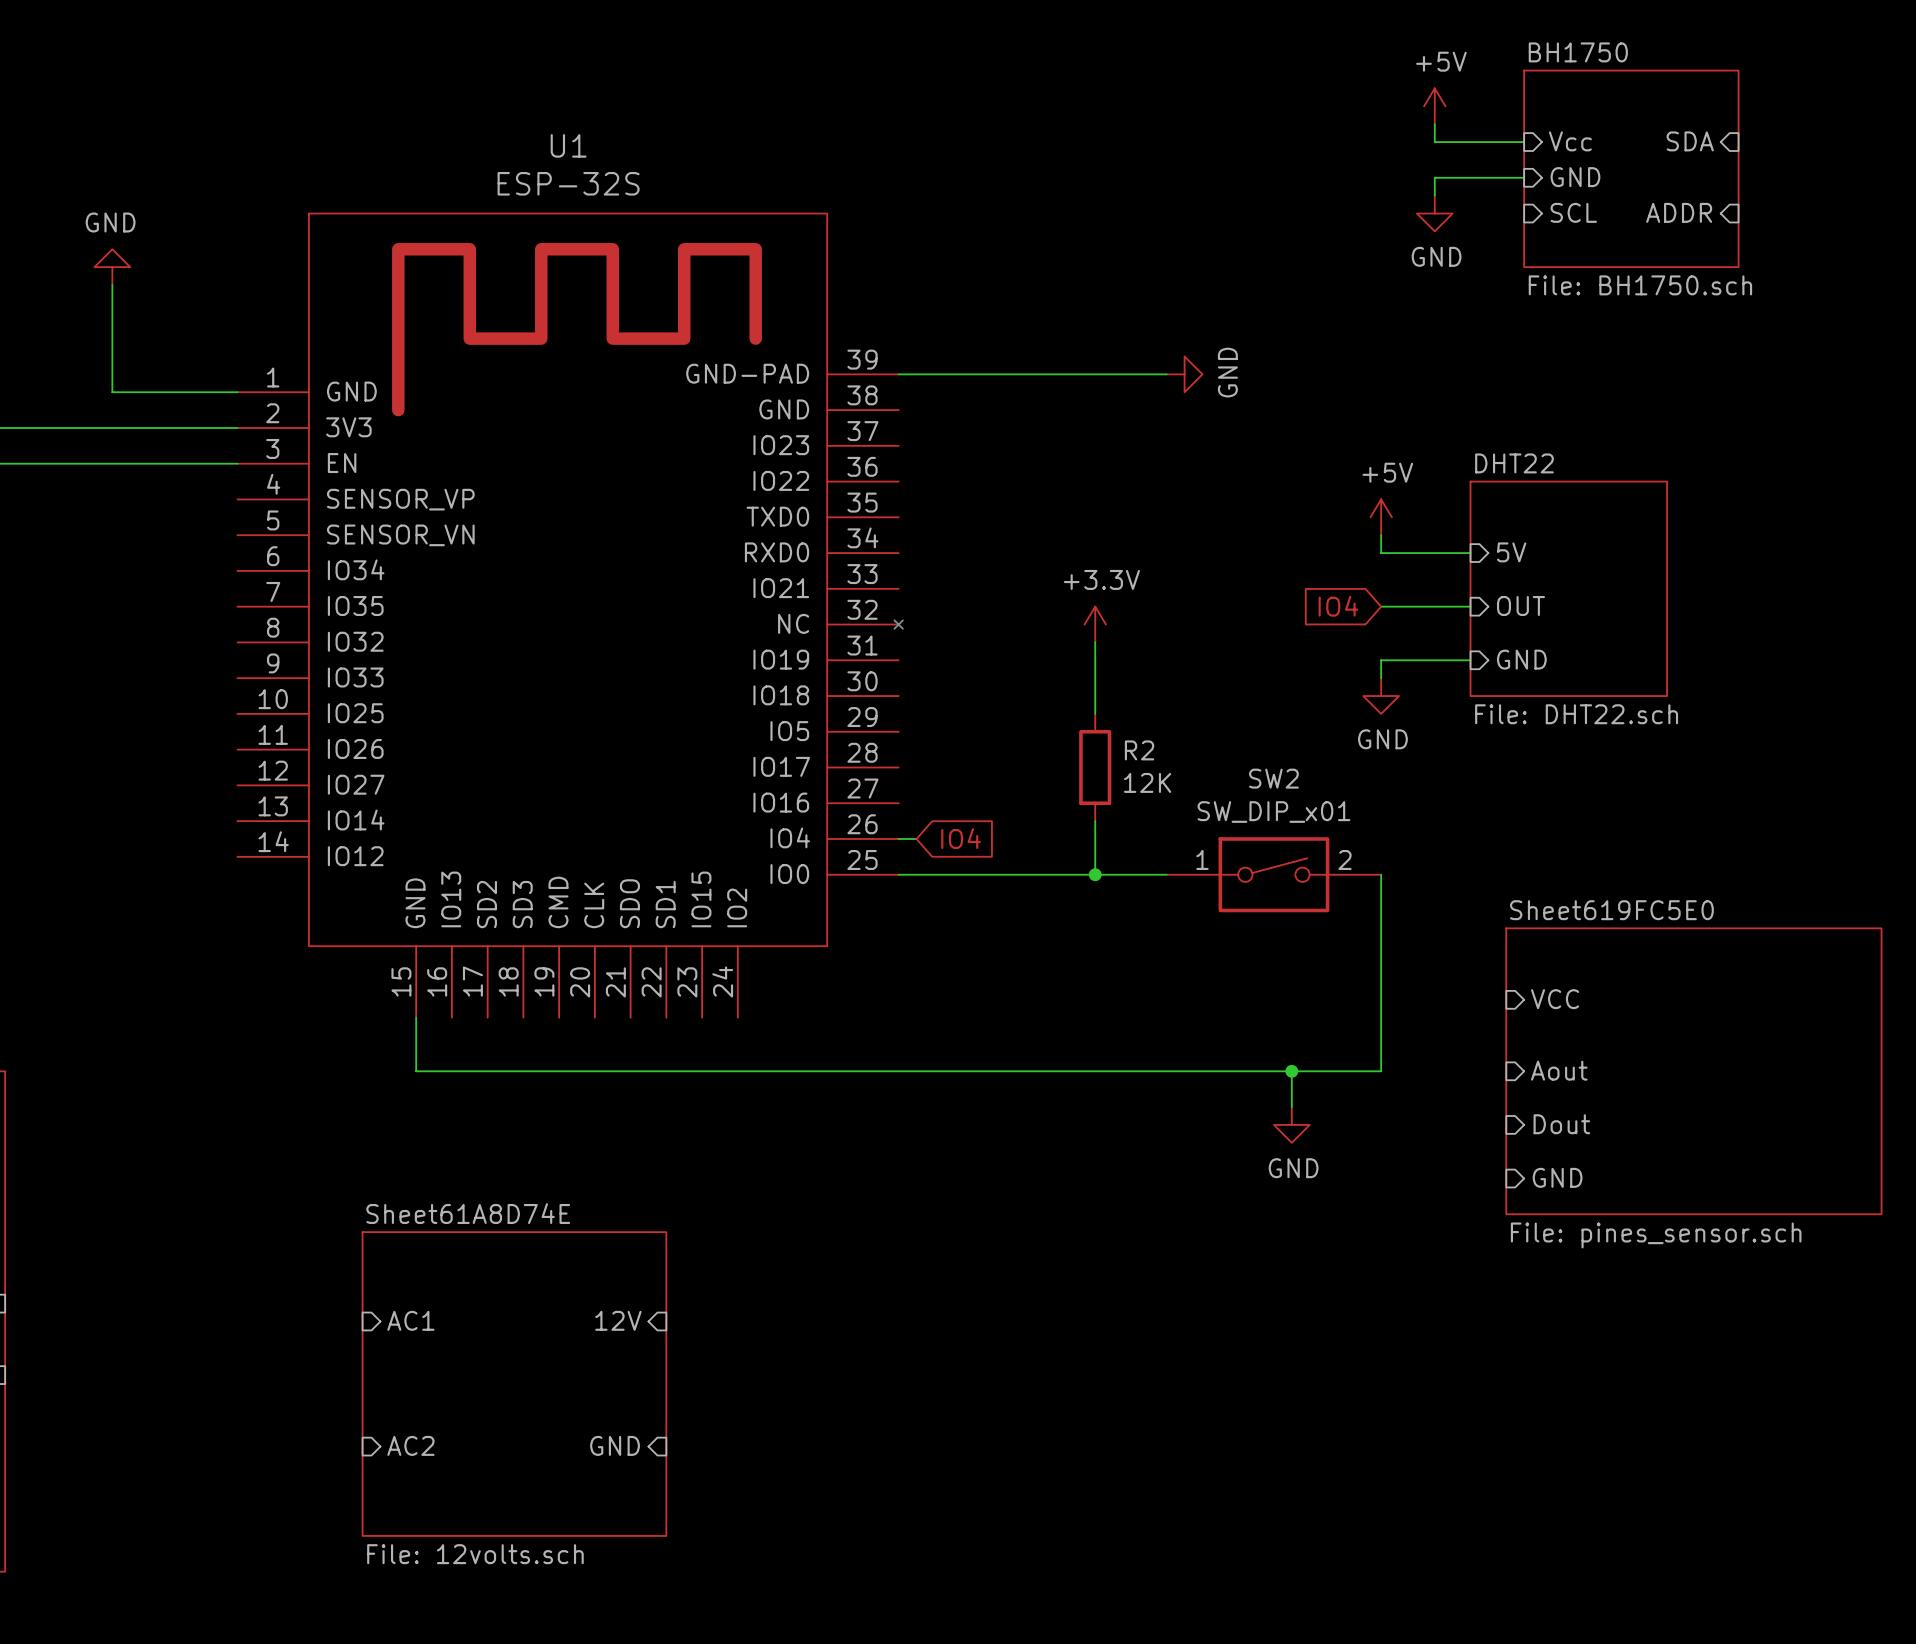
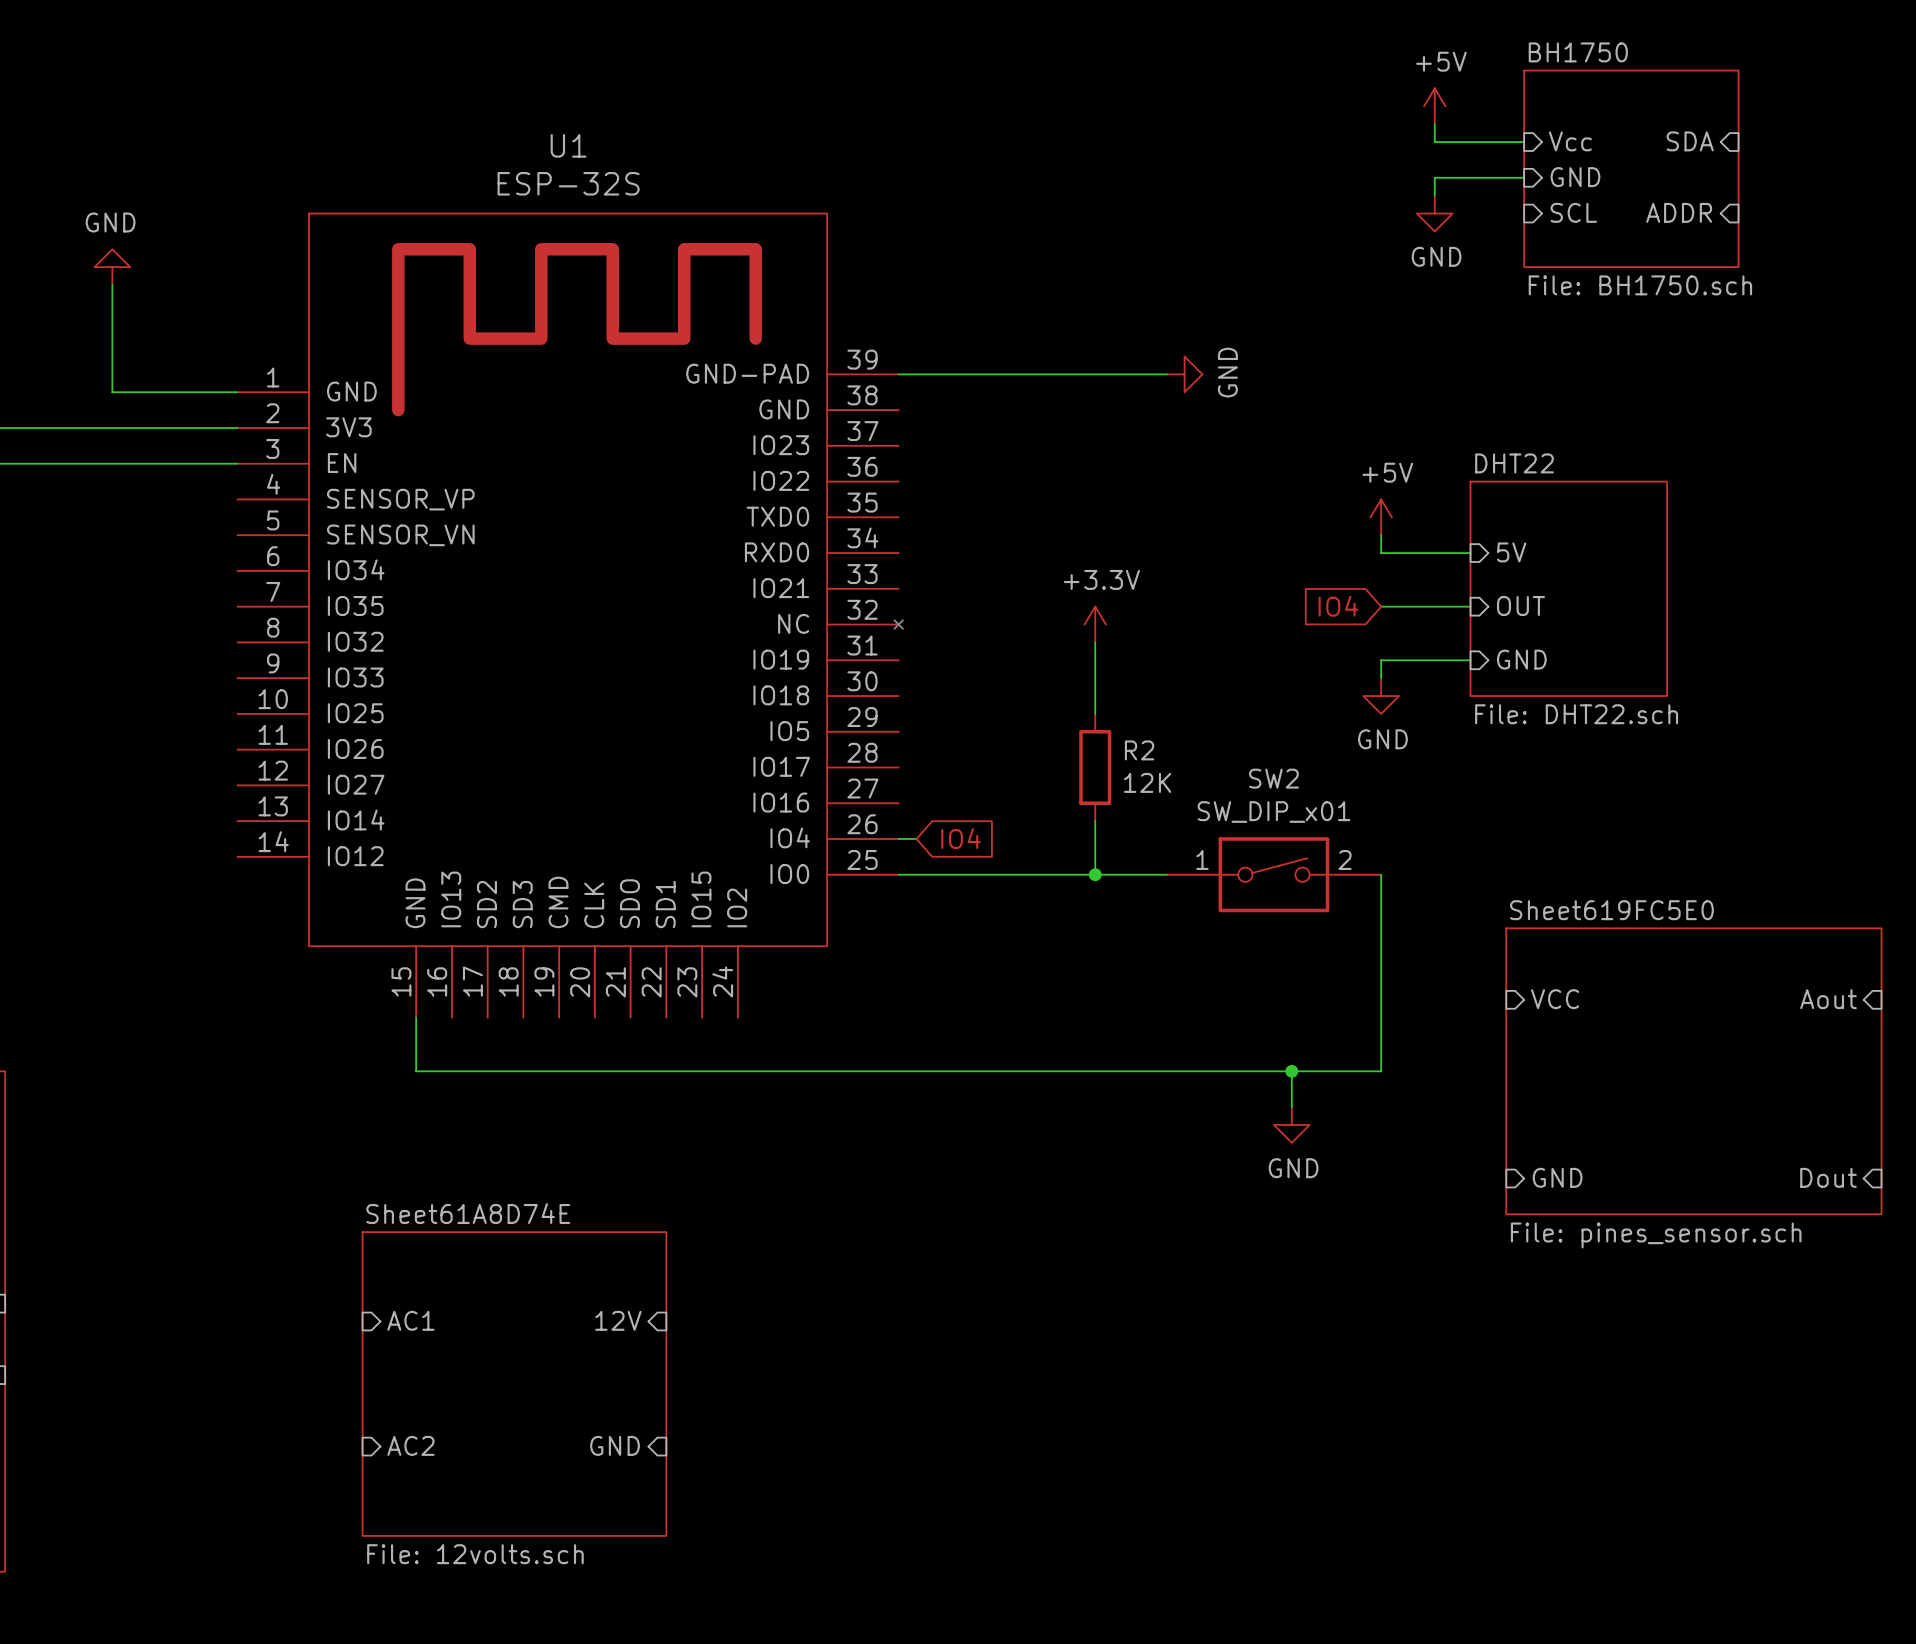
sheet pin rotation: 0° (1559, 1070) -> 180° (1828, 999)
sheet pin position: Aout (1559, 1070) -> Aout (1828, 999)
sheet pin rotation: 0° (1561, 1124) -> 180° (1828, 1177)
sheet pin position: Dout (1561, 1124) -> Dout (1828, 1177)

